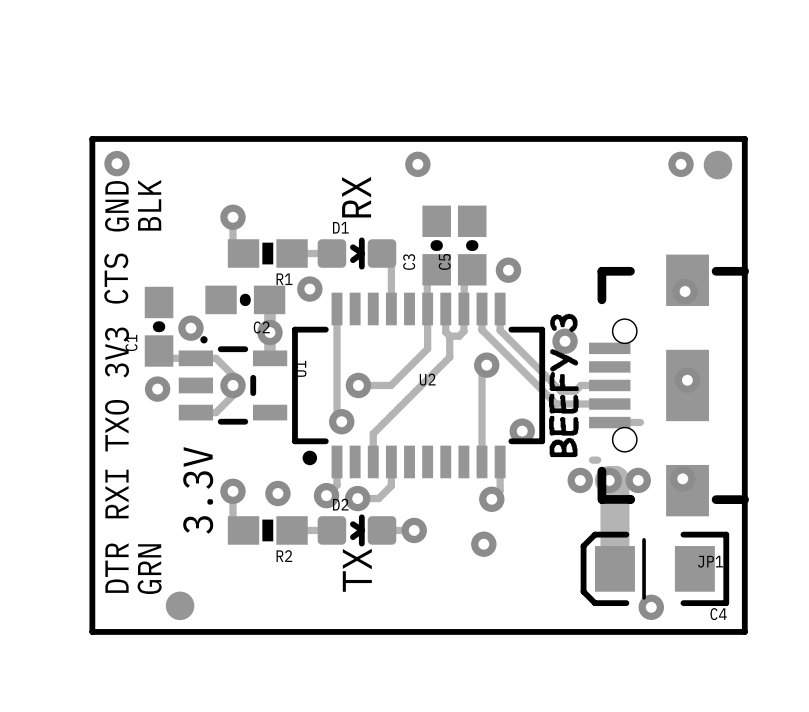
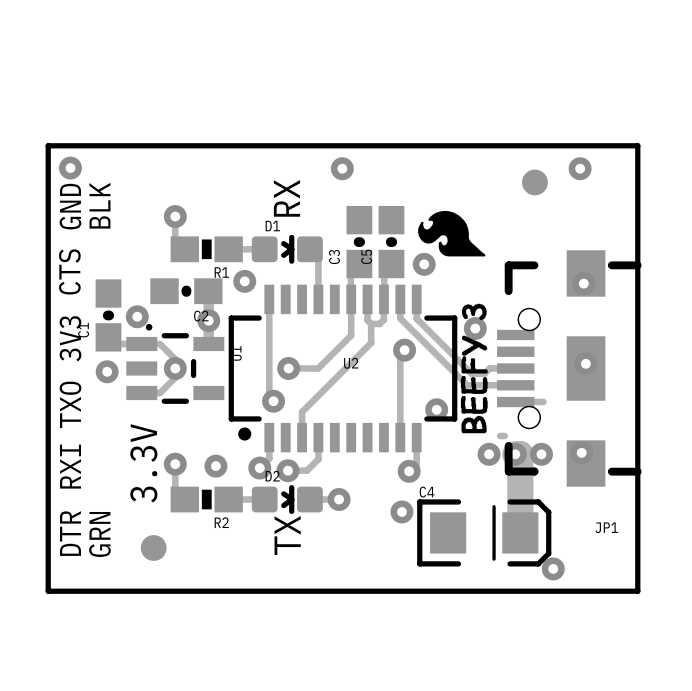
part position: (717, 165) -> (534, 182)
drawing: none -> [418, 210, 486, 257]
C4 rotation: 0° (654, 568) -> 180° (484, 532)
part position: (180, 605) -> (153, 547)

